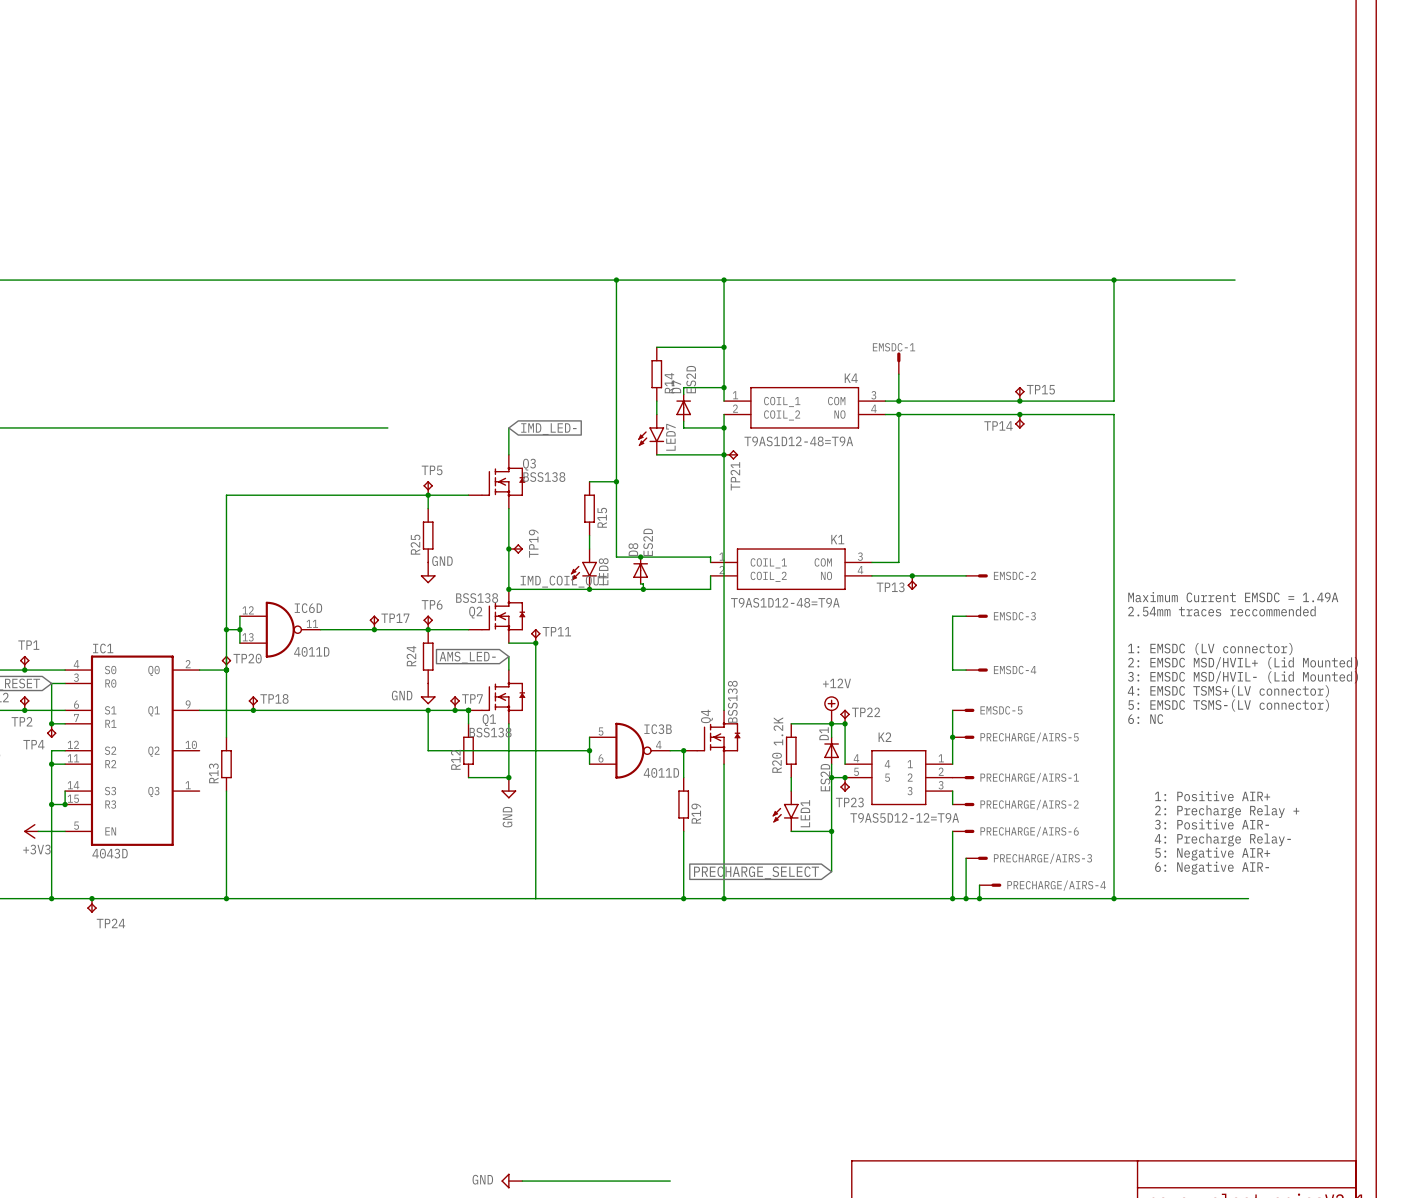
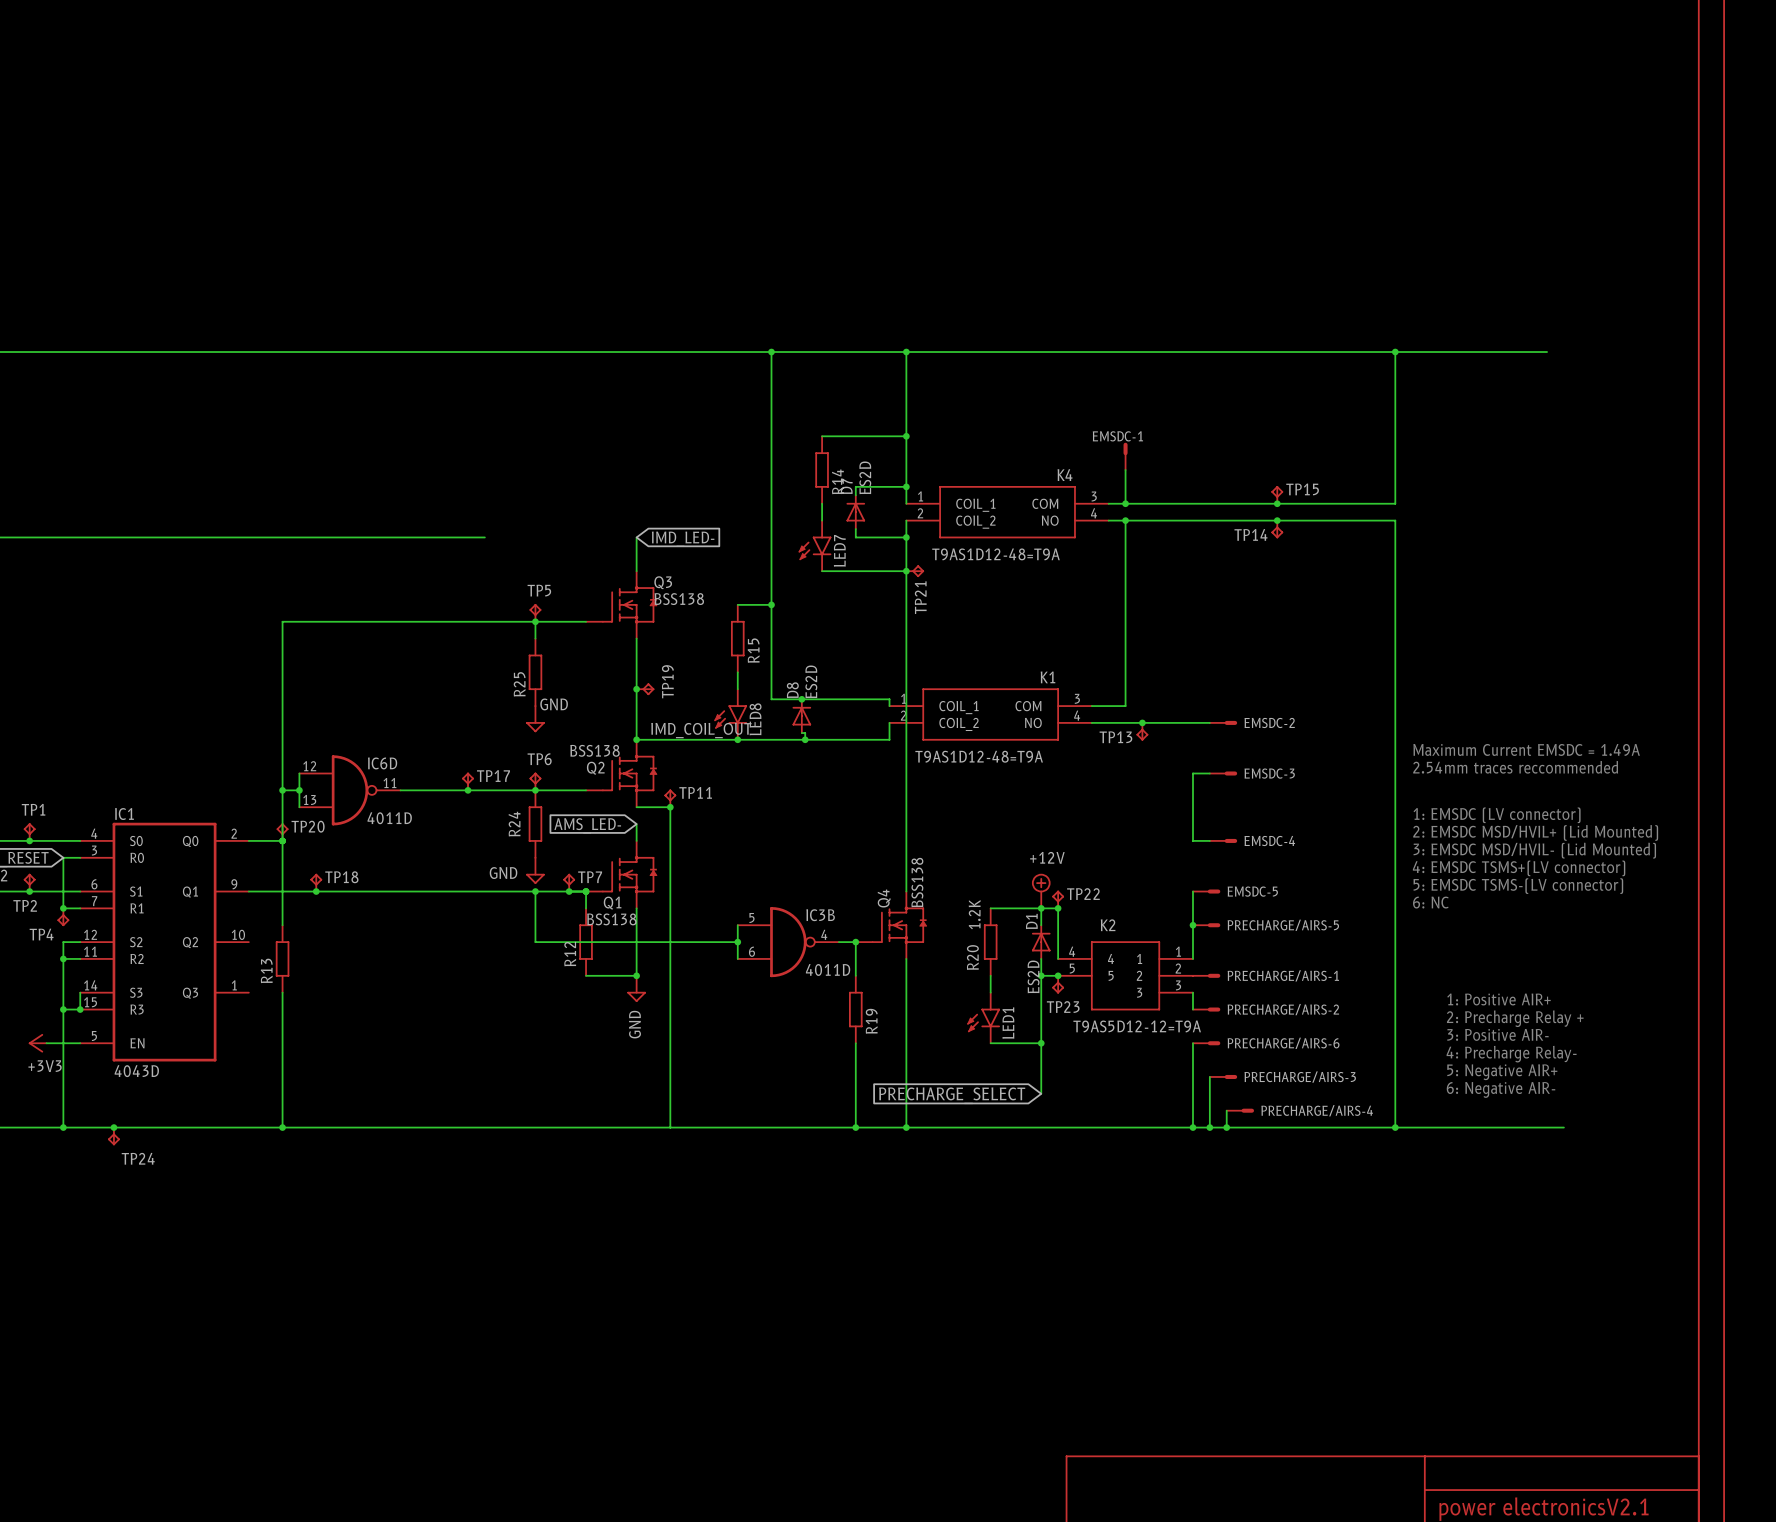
power symbol: GND (511, 1181) -> none
wire: (522, 1181) (670, 1181) -> none

